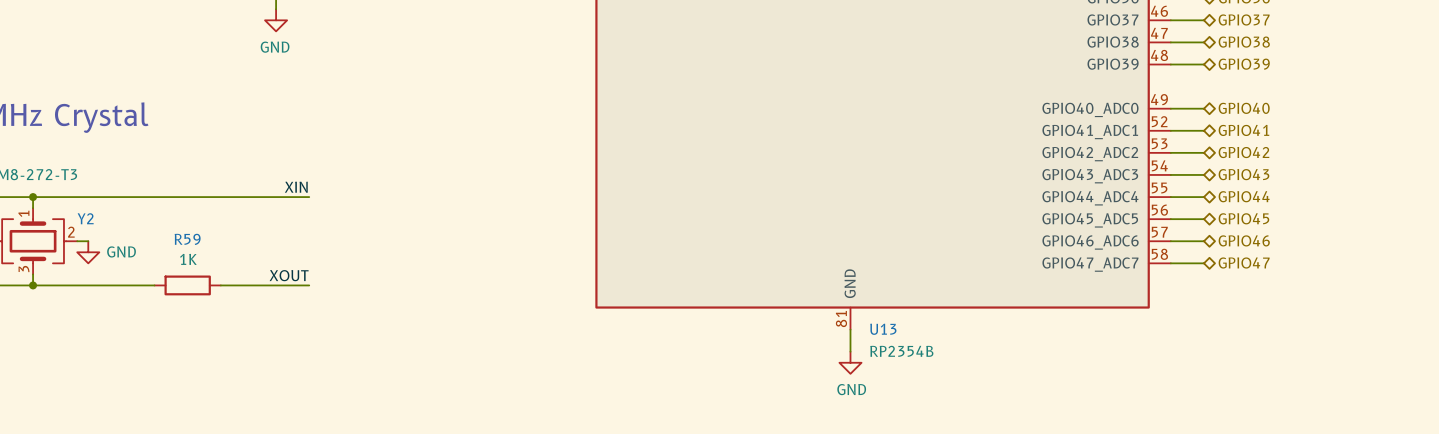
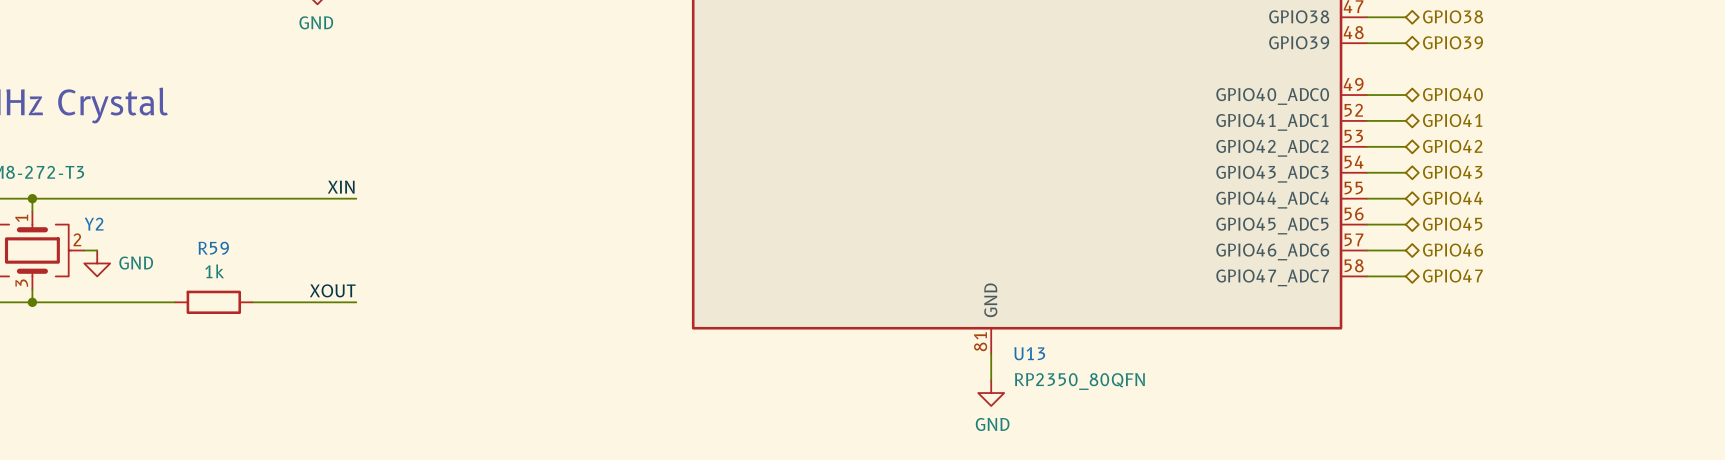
R59 value: 1K (188, 259) -> 1k (214, 271)
U13 value: RP2354B (901, 351) -> RP2350_80QFN (1079, 381)

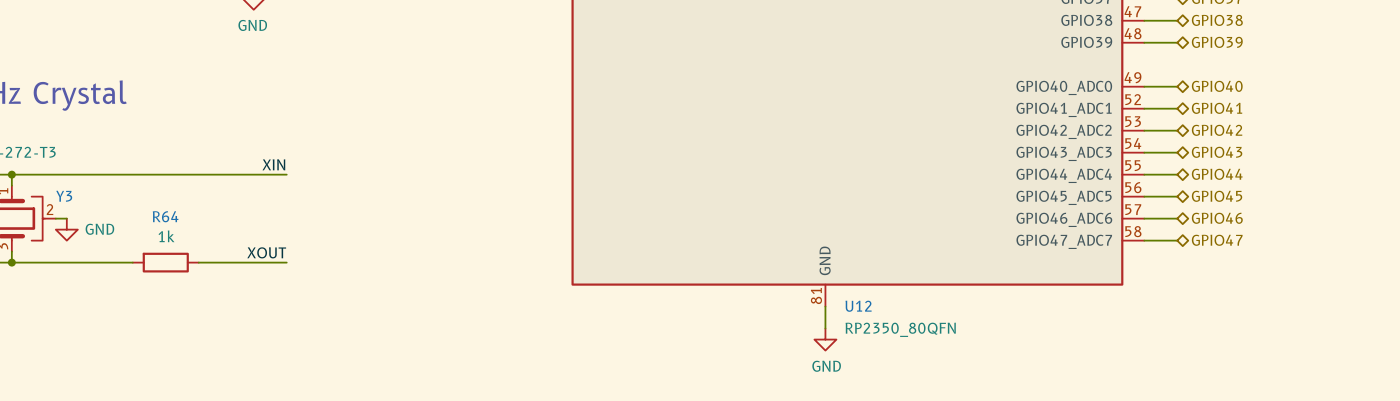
Y2 name: Y2 (94, 224) -> Y3 (64, 196)
R59 name: R59 (213, 248) -> R64 (165, 216)
U13 name: U13 (1029, 353) -> U12 (858, 306)

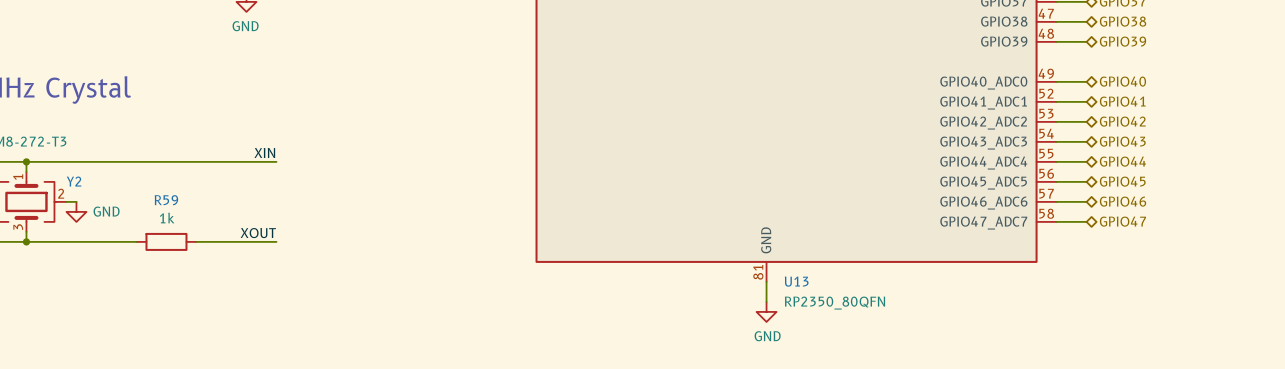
Y3 name: Y3 (64, 196) -> Y2 (74, 181)
R64 name: R64 (165, 216) -> R59 (166, 200)
U12 name: U12 (858, 306) -> U13 (796, 281)

